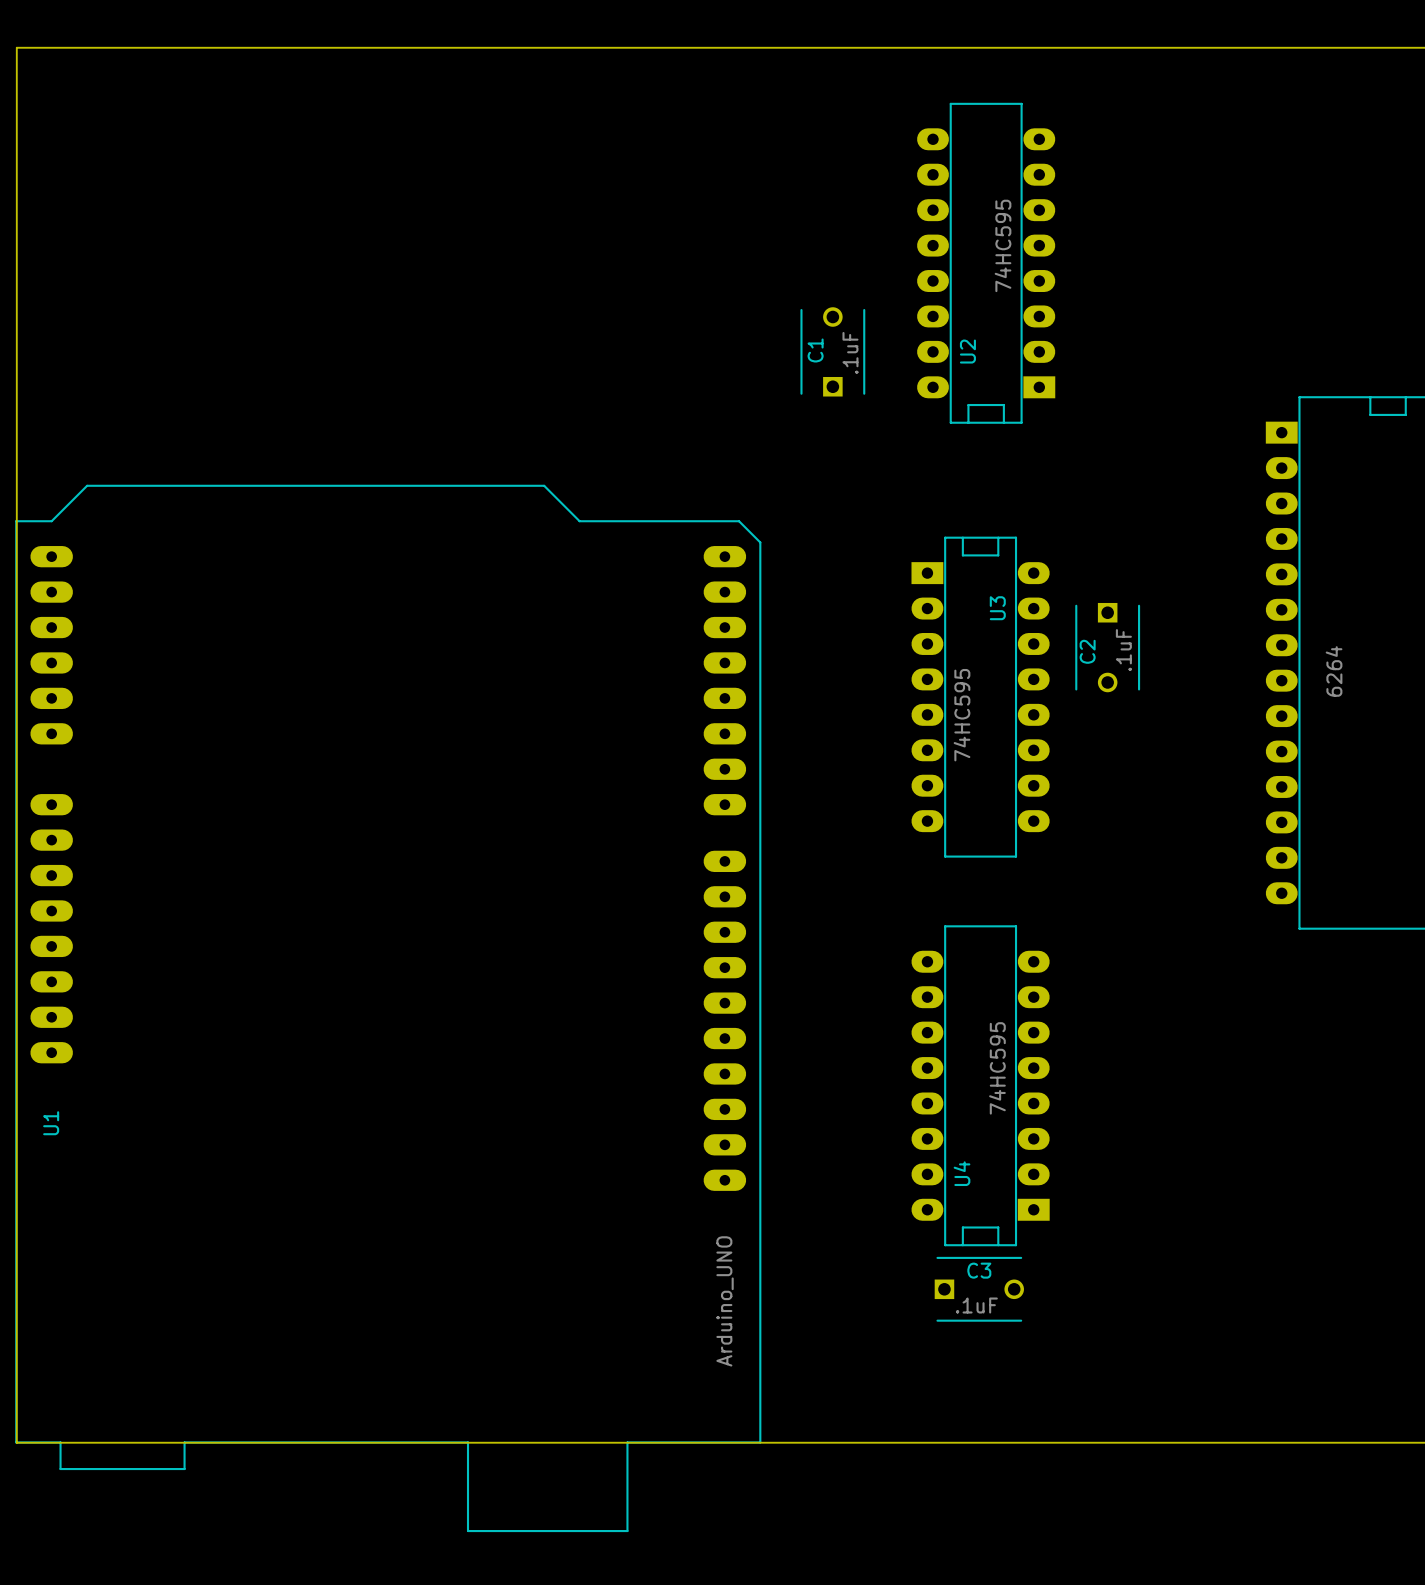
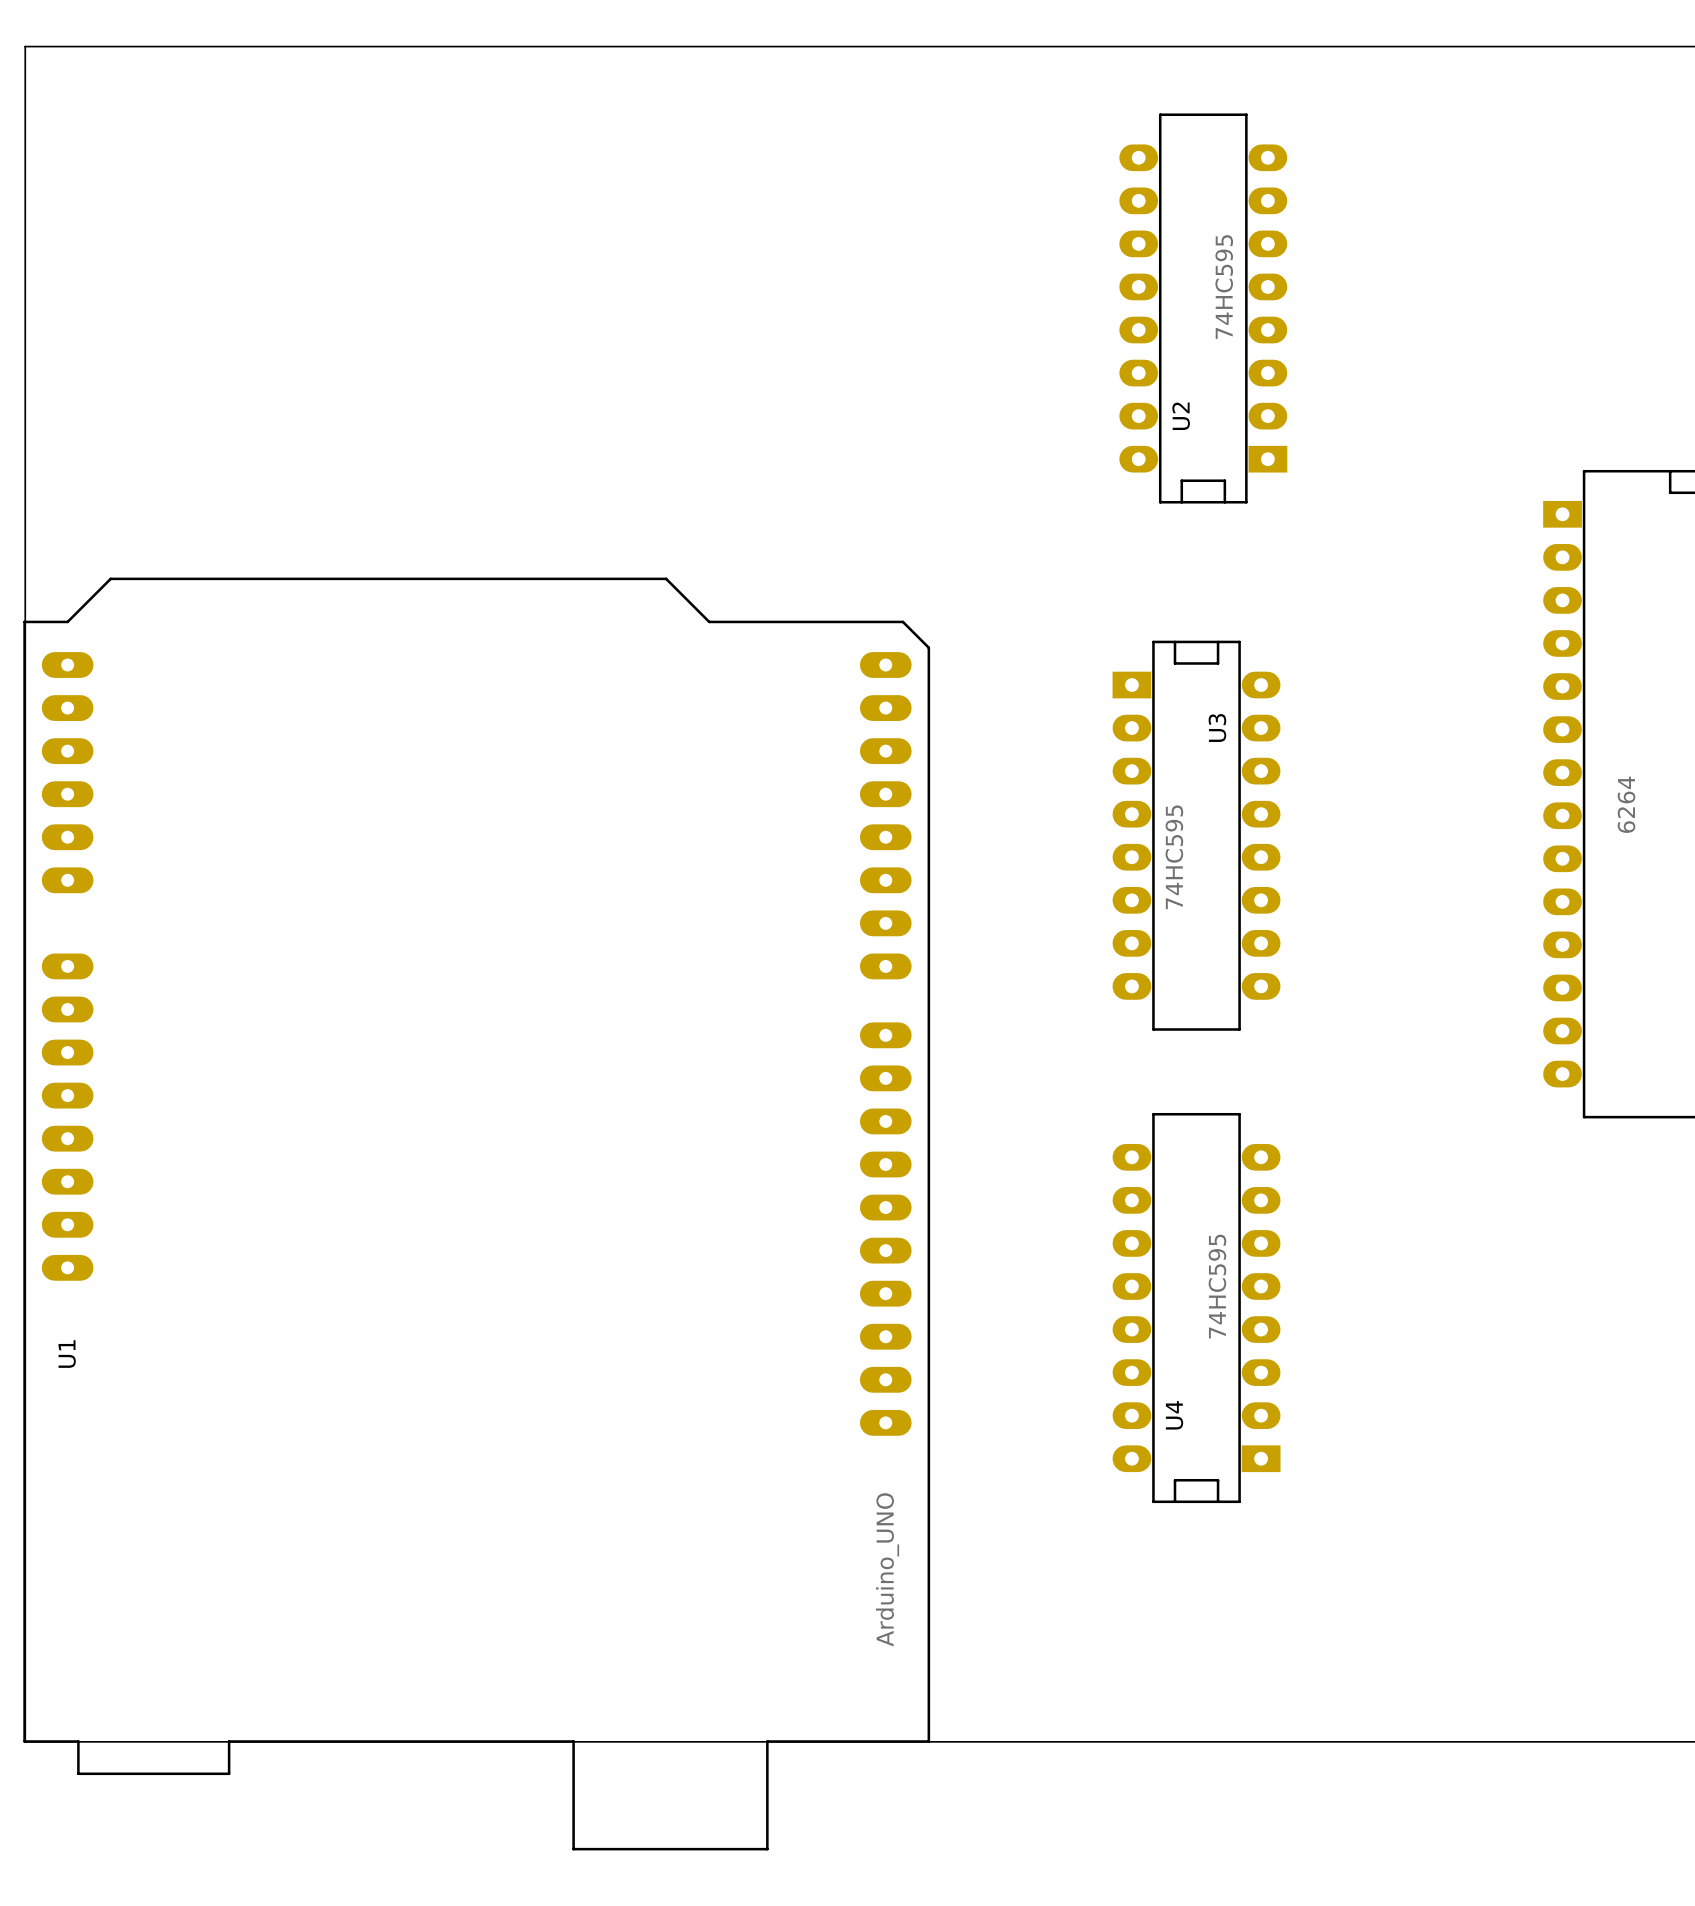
C1: .1uF (832, 351) -> none
C2: .1uF (1107, 647) -> none
C3: .1uF (979, 1289) -> none

